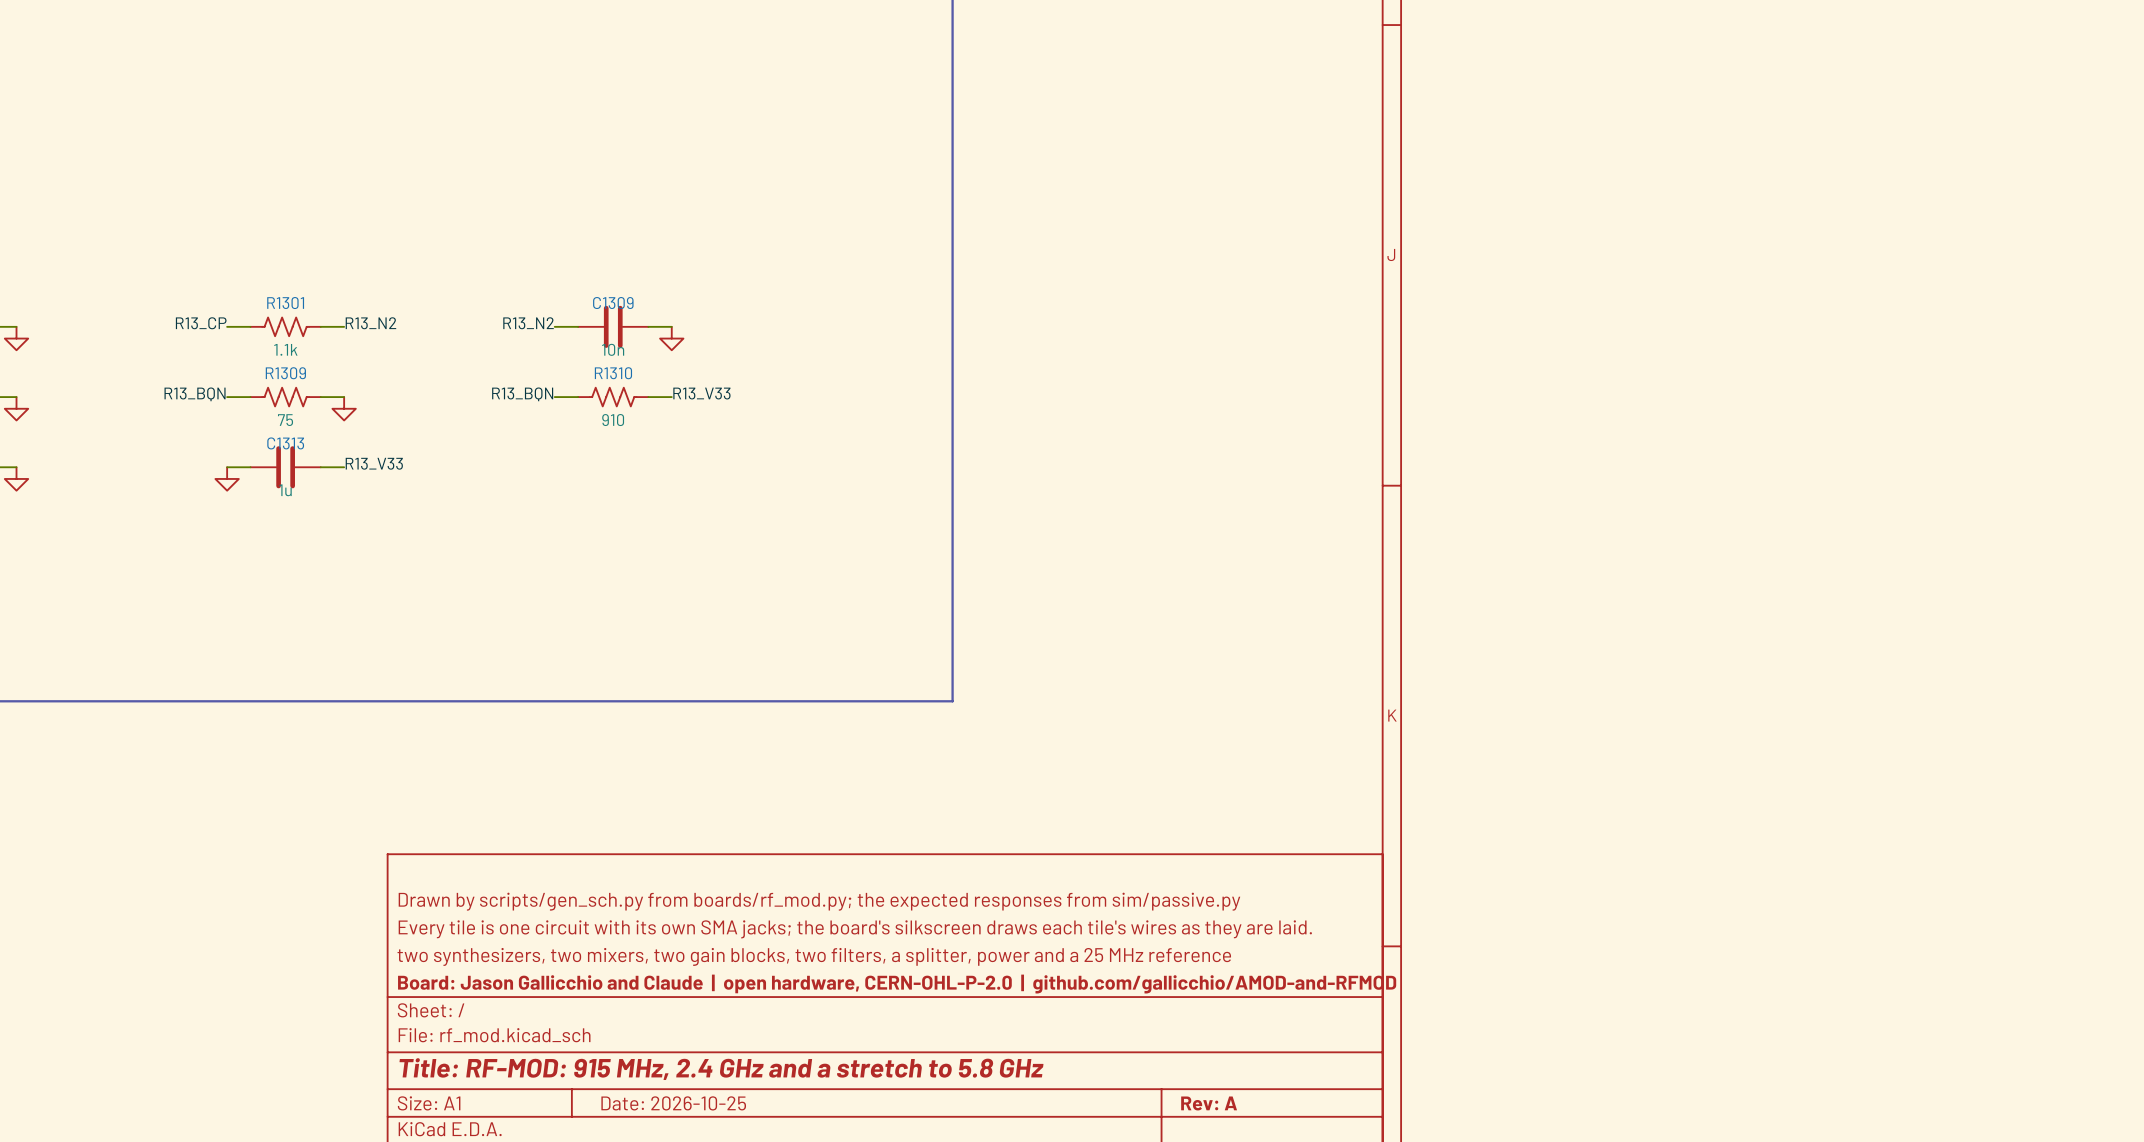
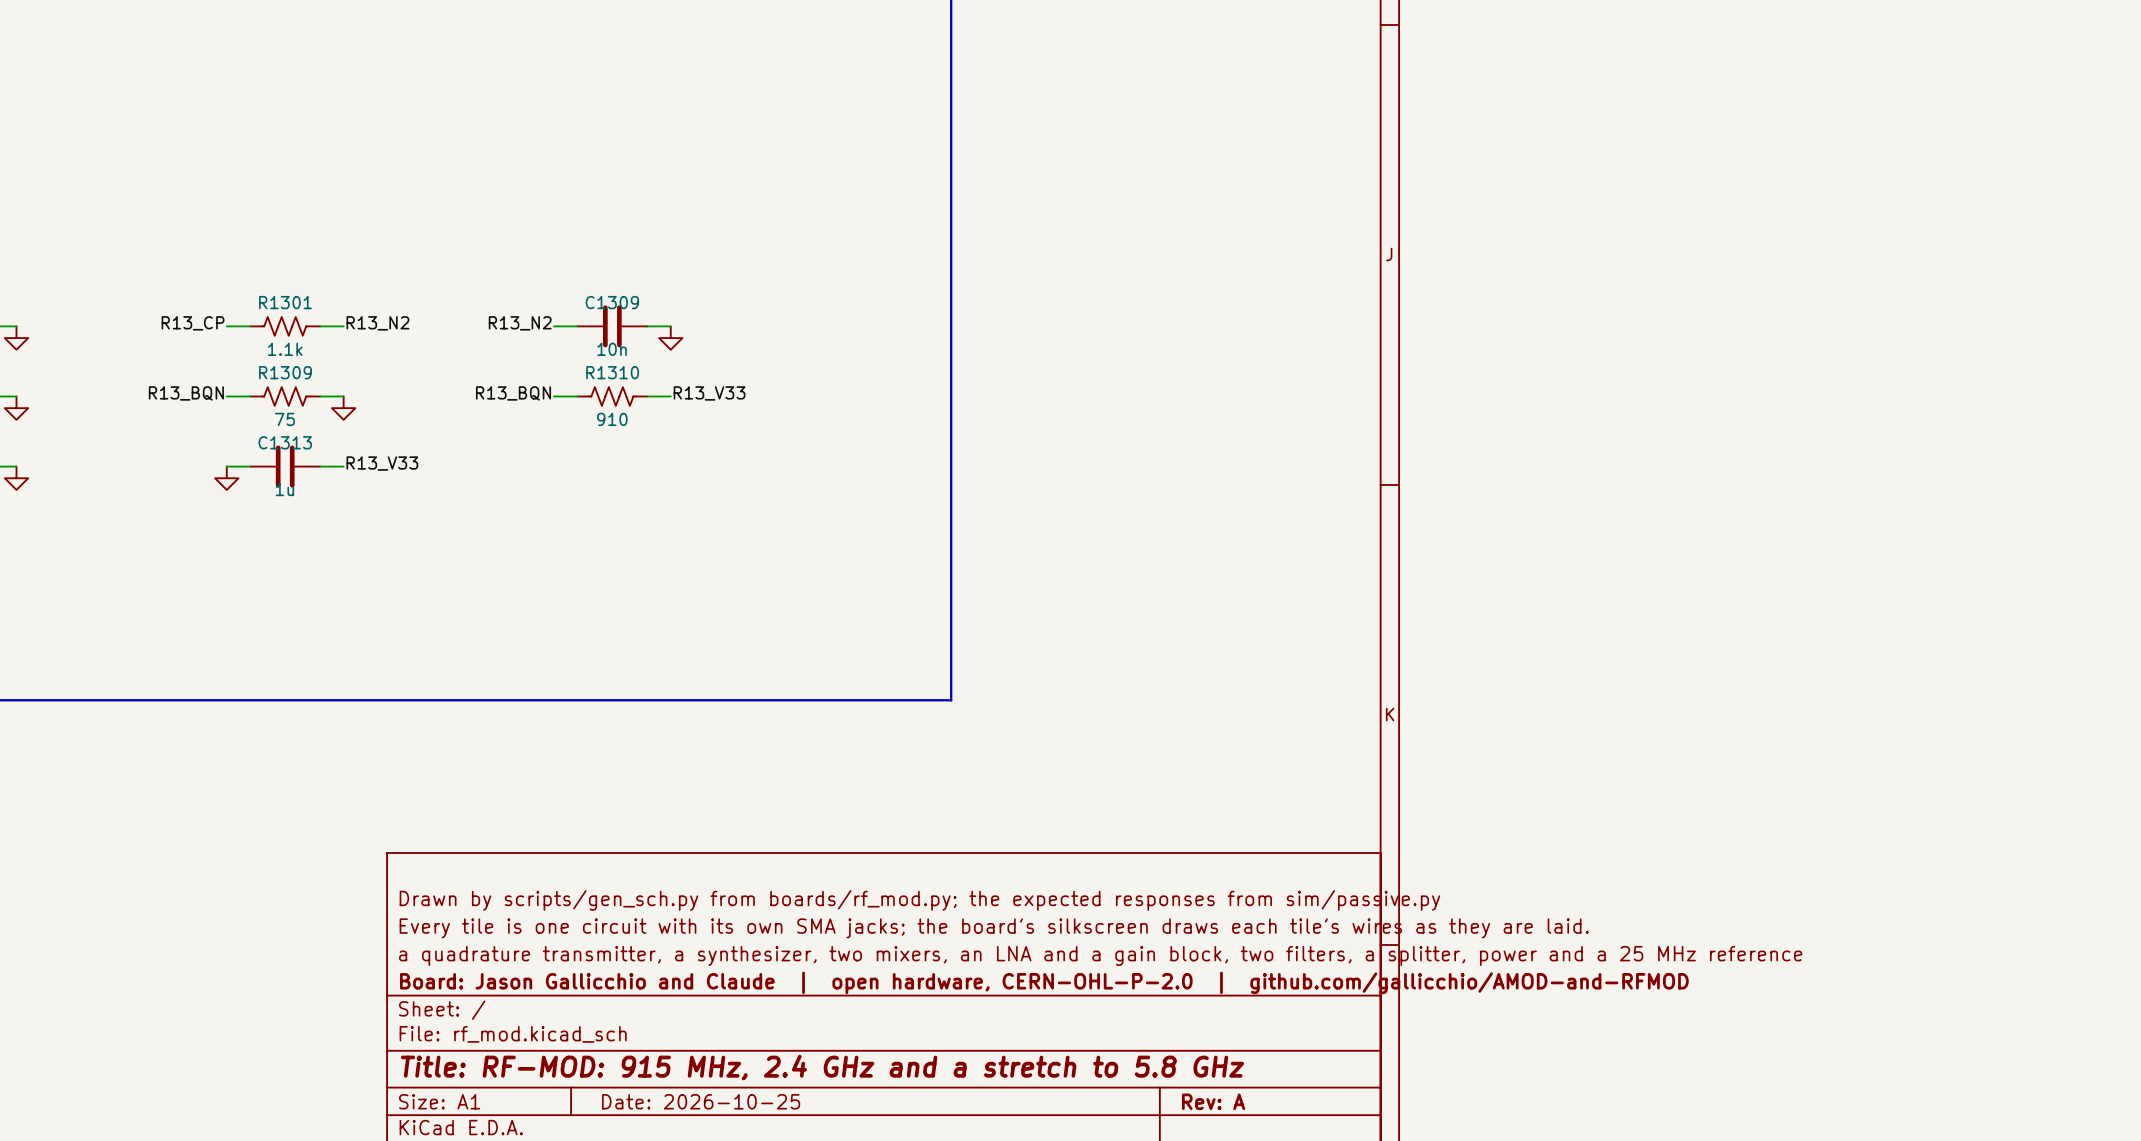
title block: two synthesizers, two mixers, two gain blocks, two filters, a splitter, power and a 25 MHz reference (814, 956) -> a quadrature transmitter, a synthesizer, two mixers, an LNA and a gain block, two filters, a splitter, power and a 25 MHz reference (1100, 955)

